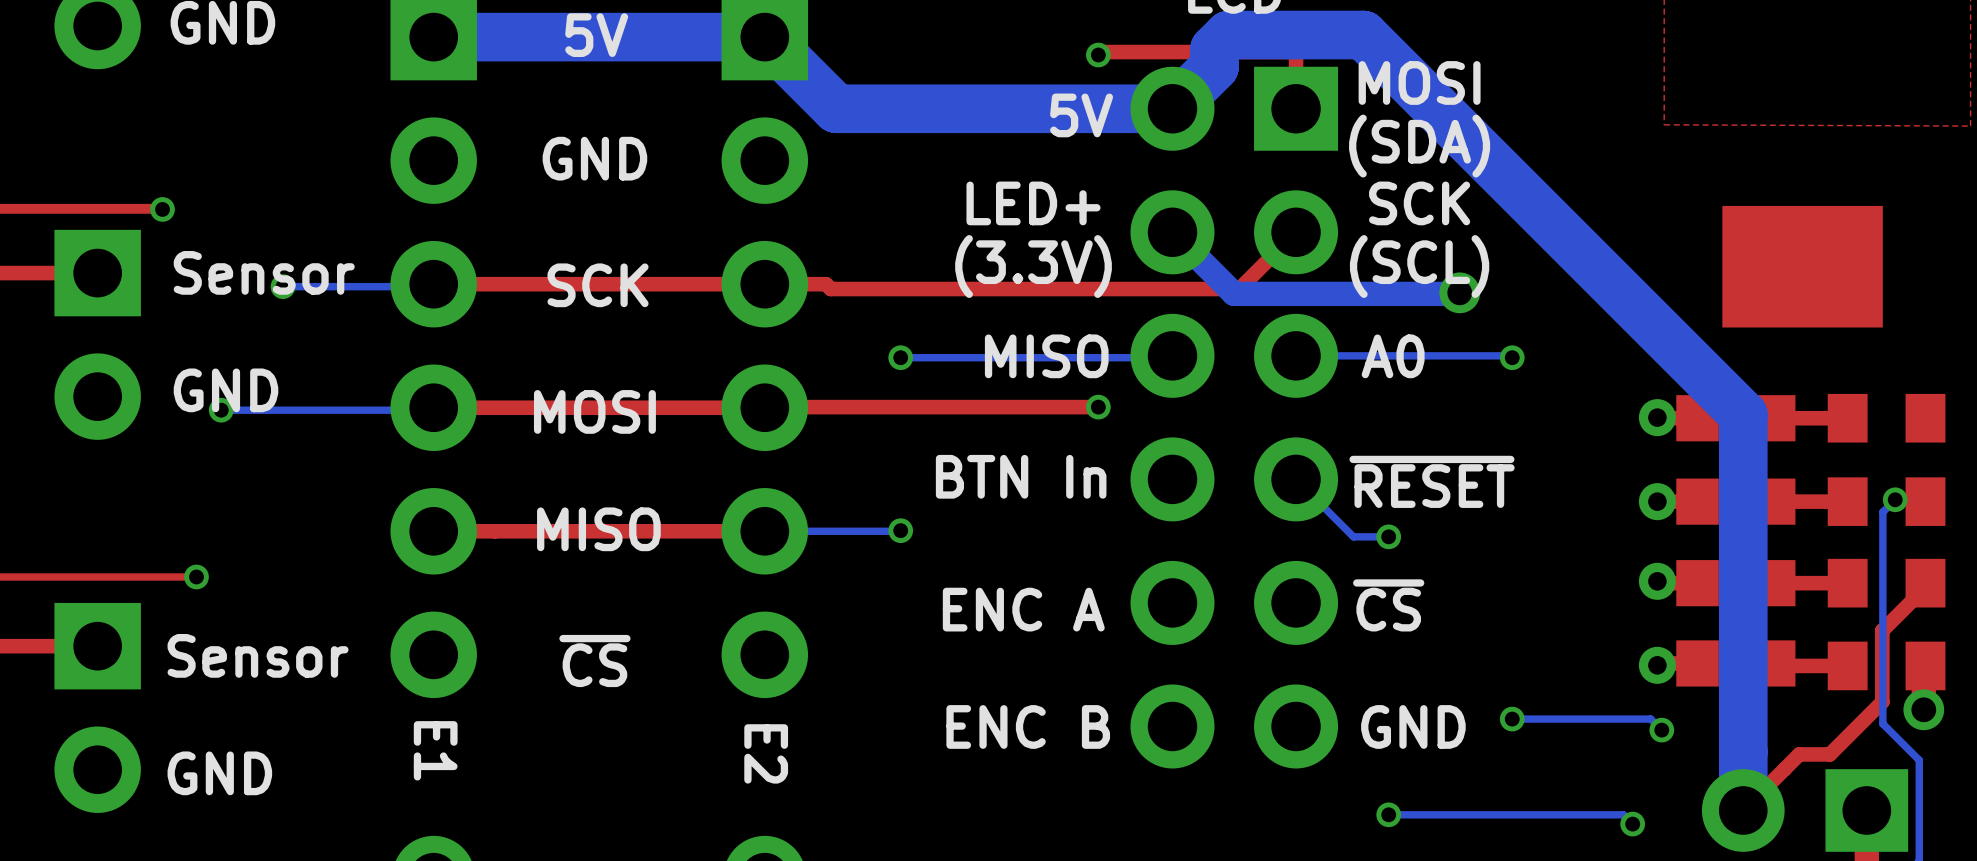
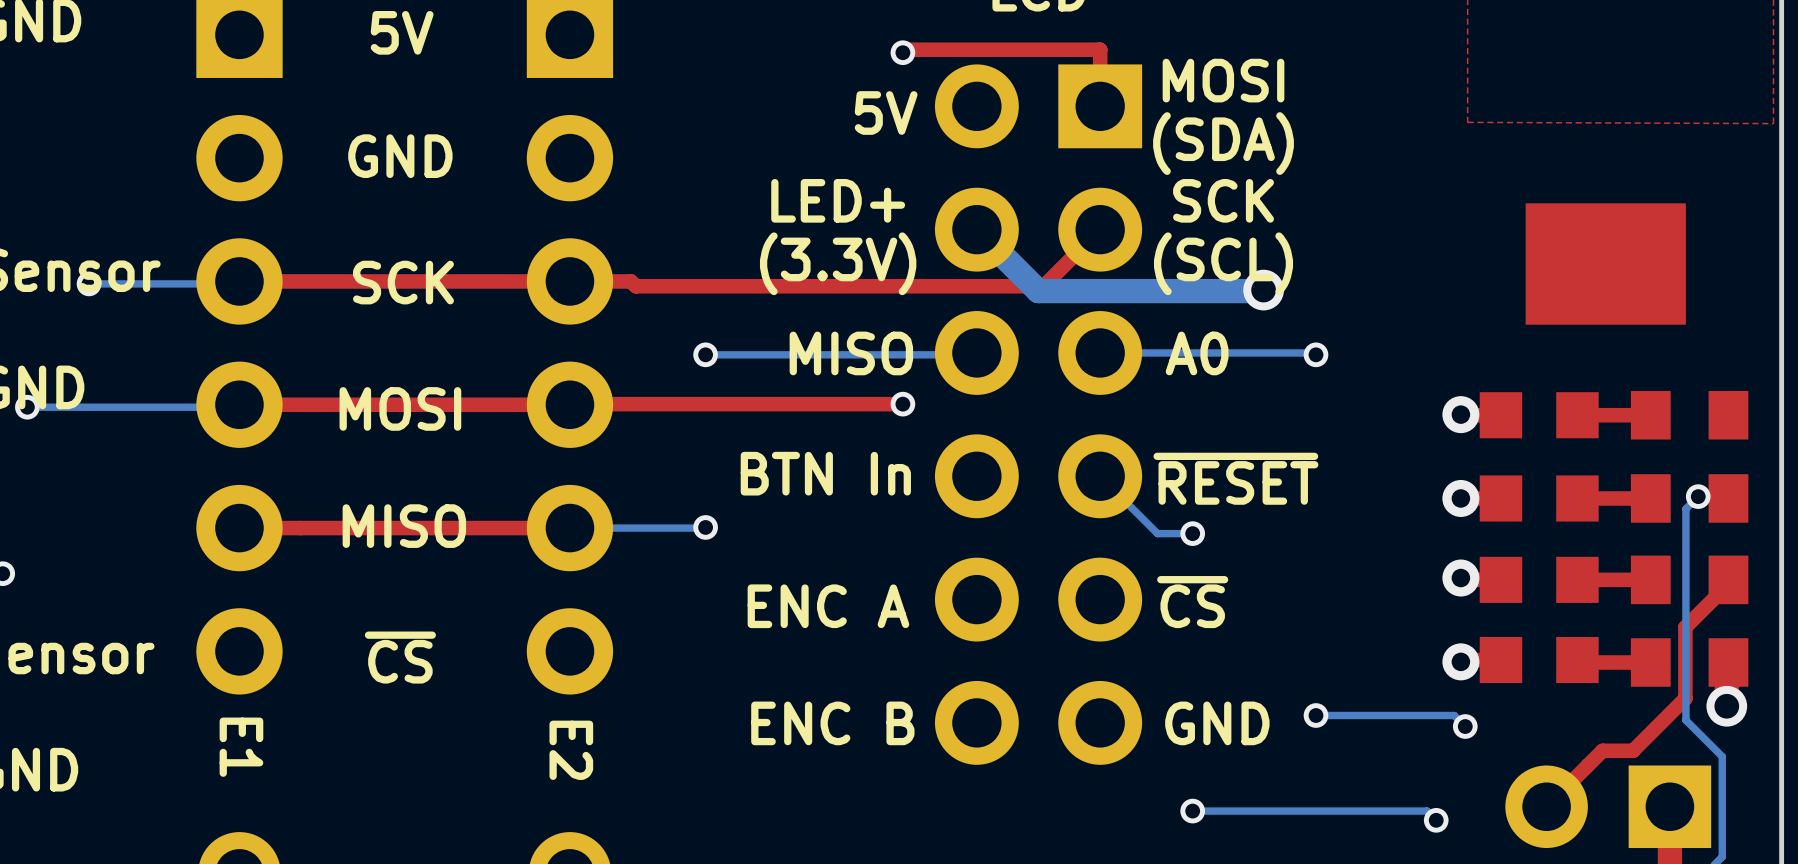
bottom track: (433, 37) (764, 37) (836, 108) (1172, 108) (1214, 66) (1214, 49) (1228, 35) (1363, 35) (1743, 414) (1743, 810) -> none

